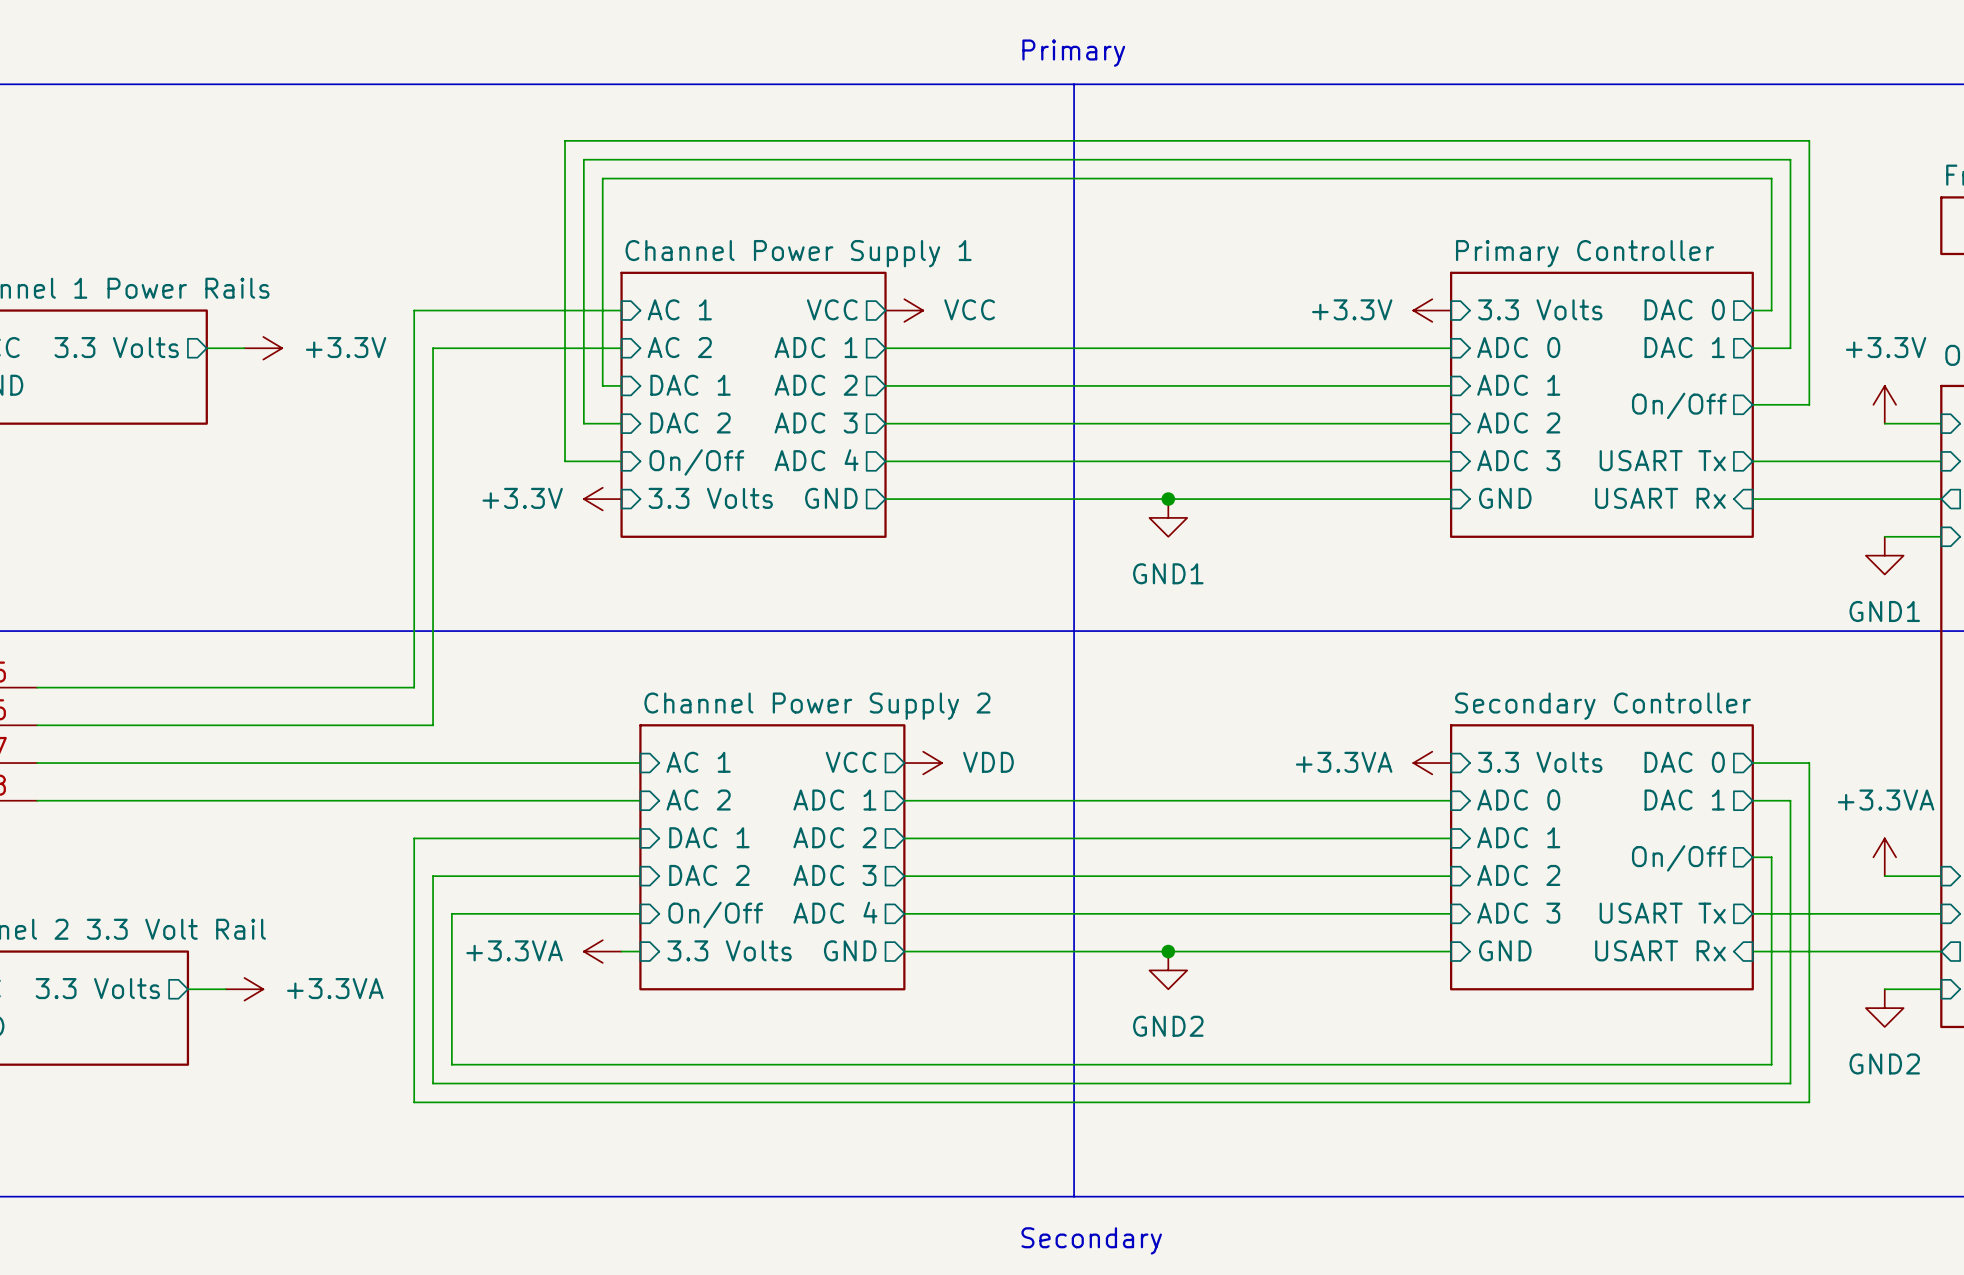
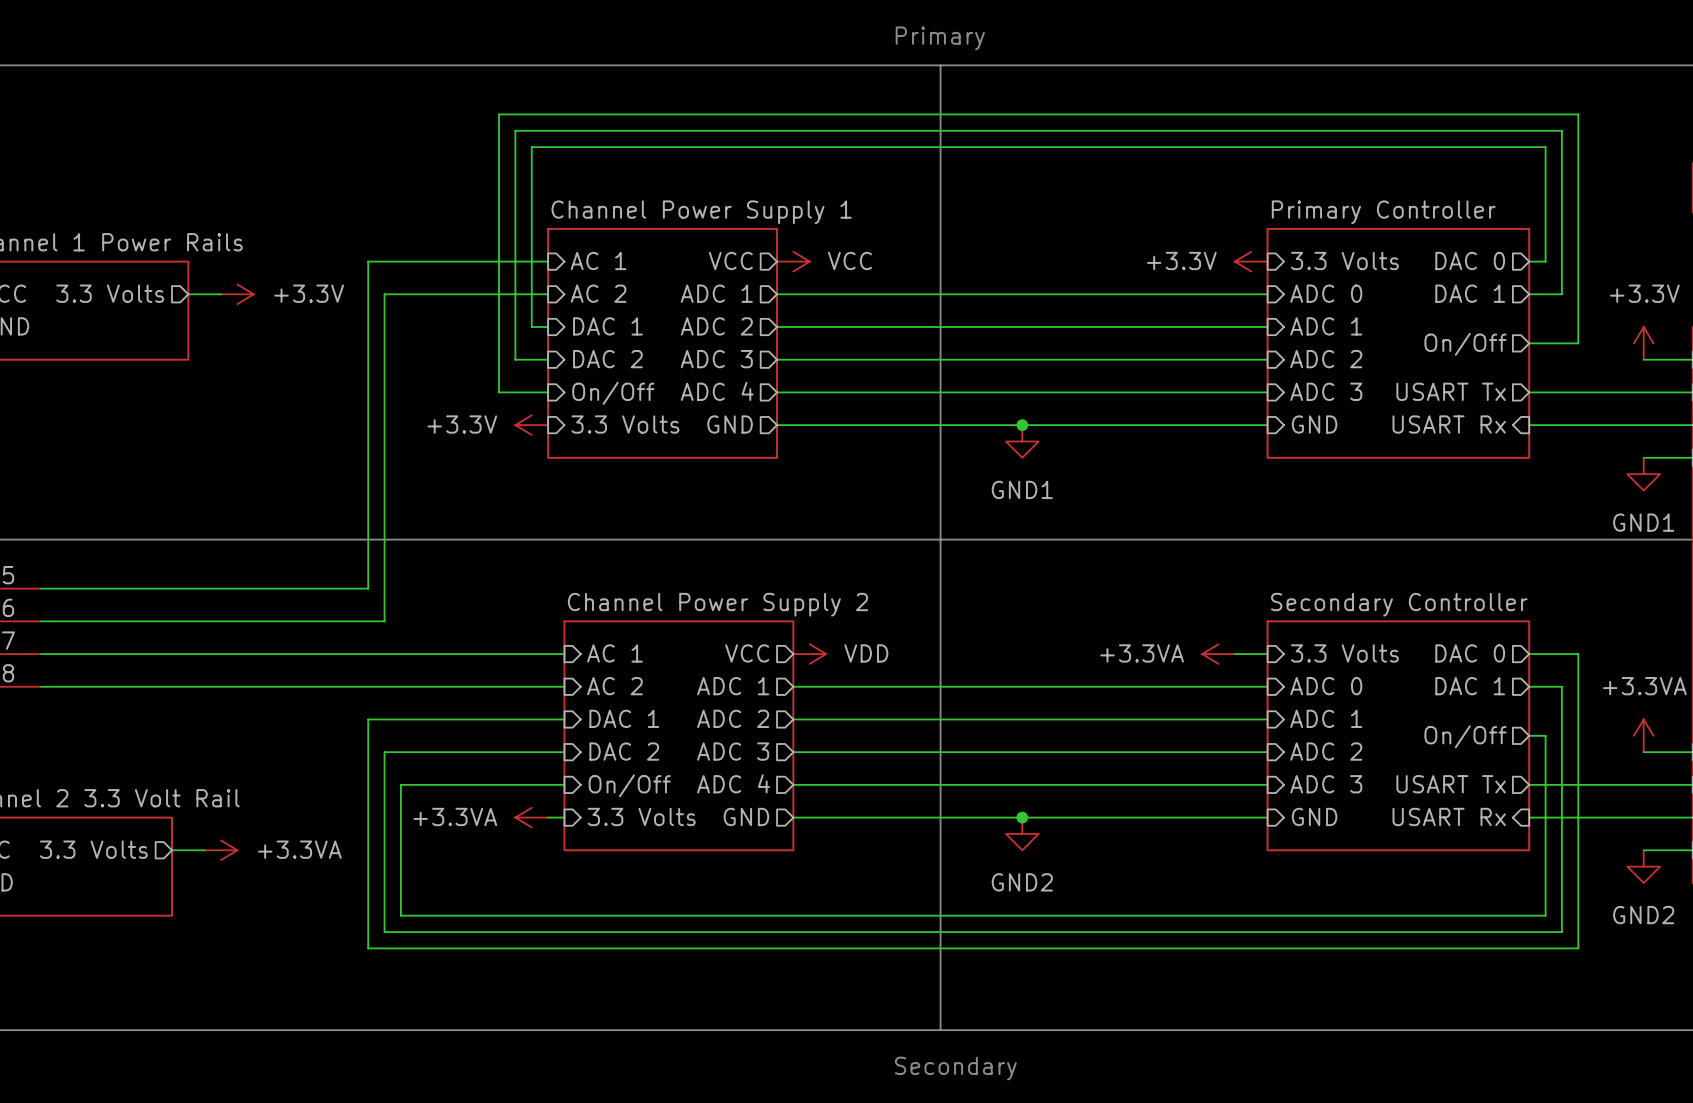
power symbol position: +3.3VA (1432, 763) -> +3.3VA (1218, 654)

